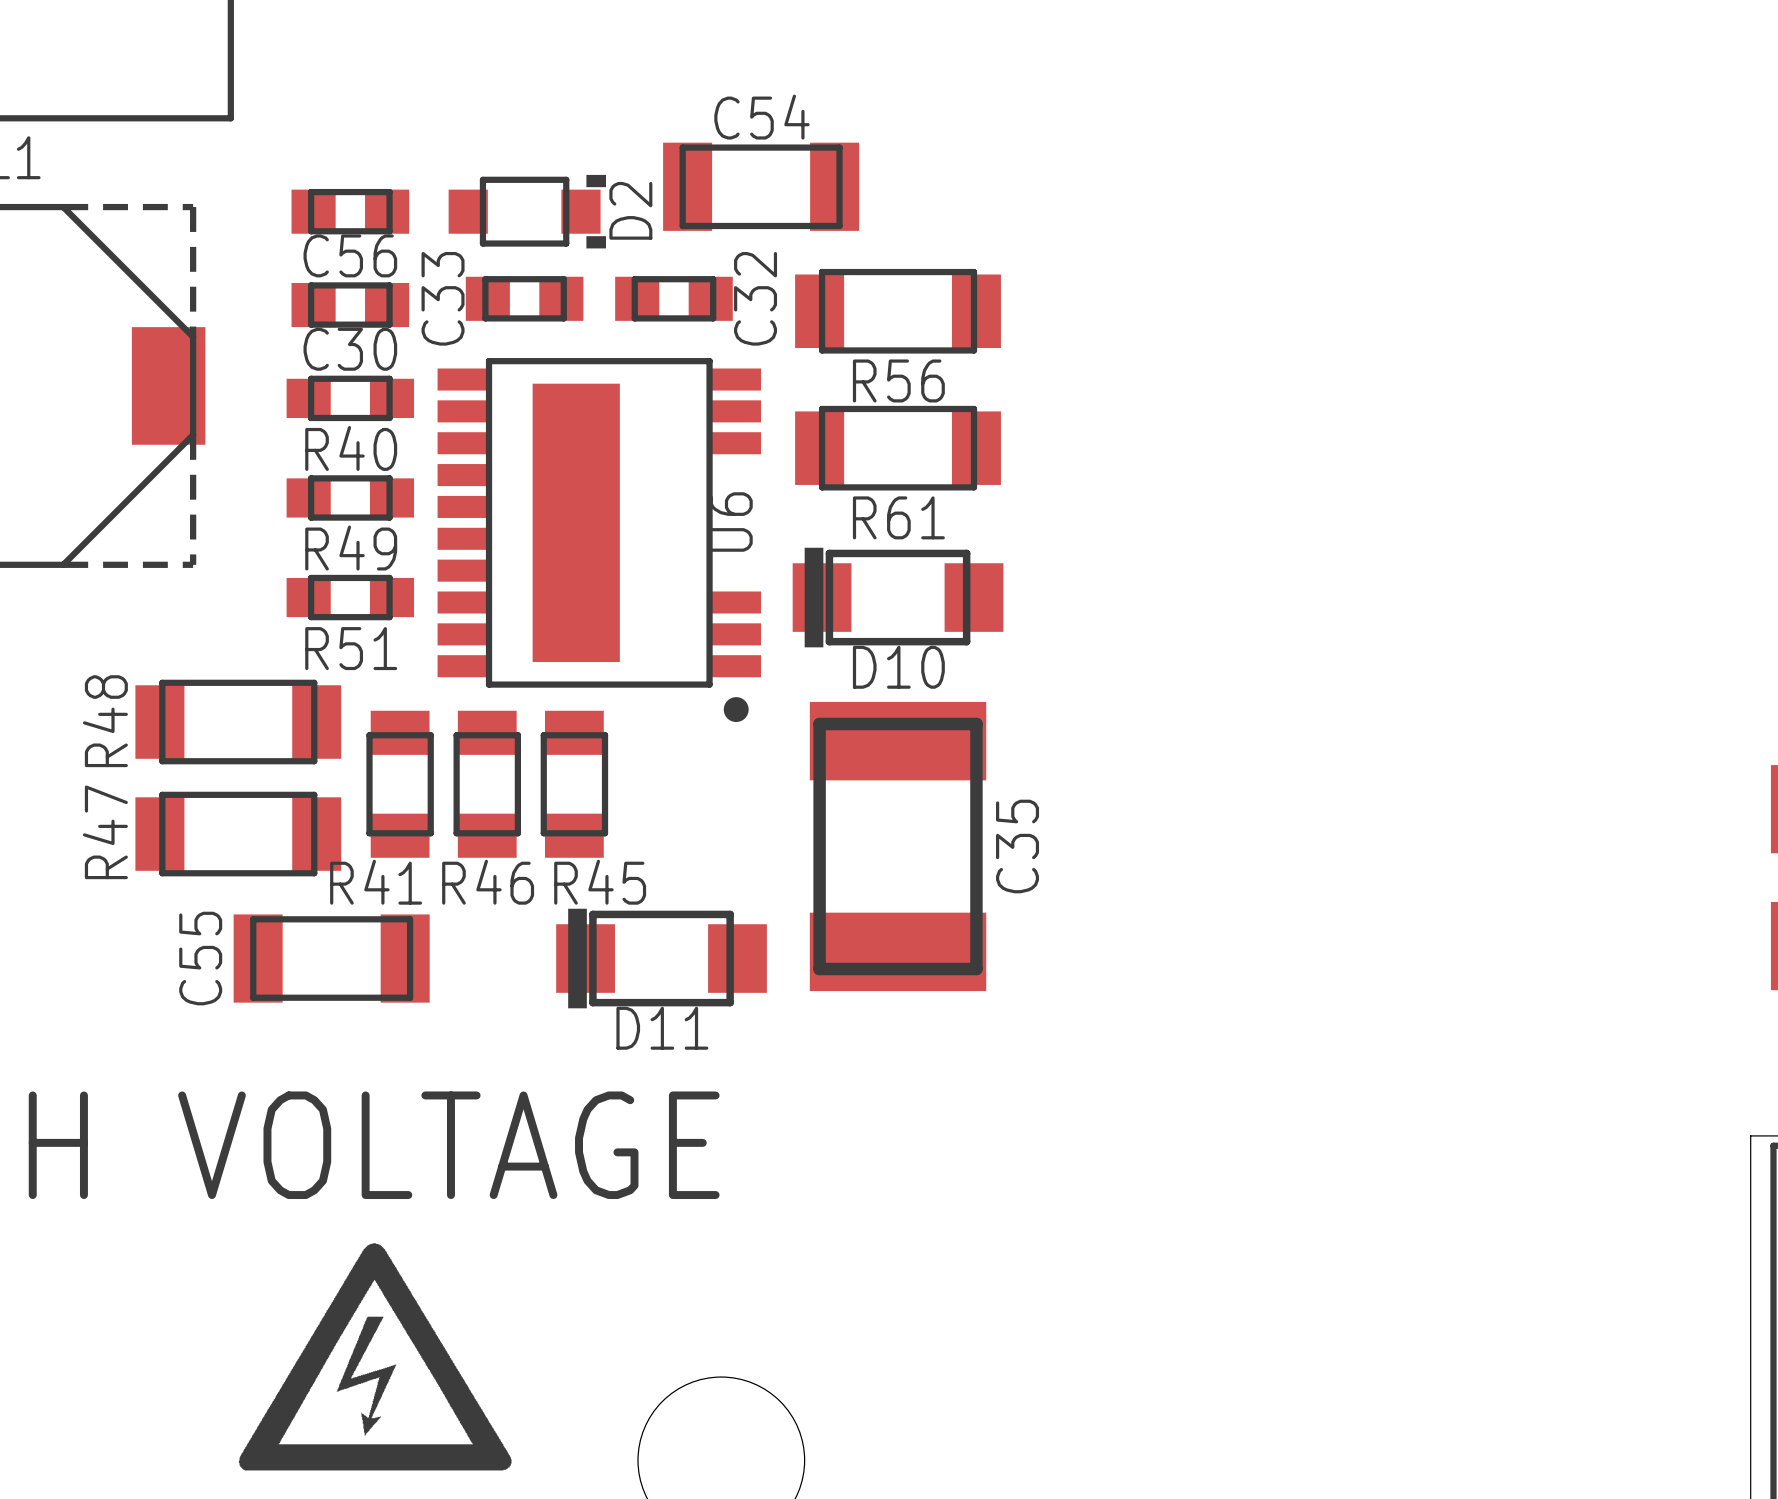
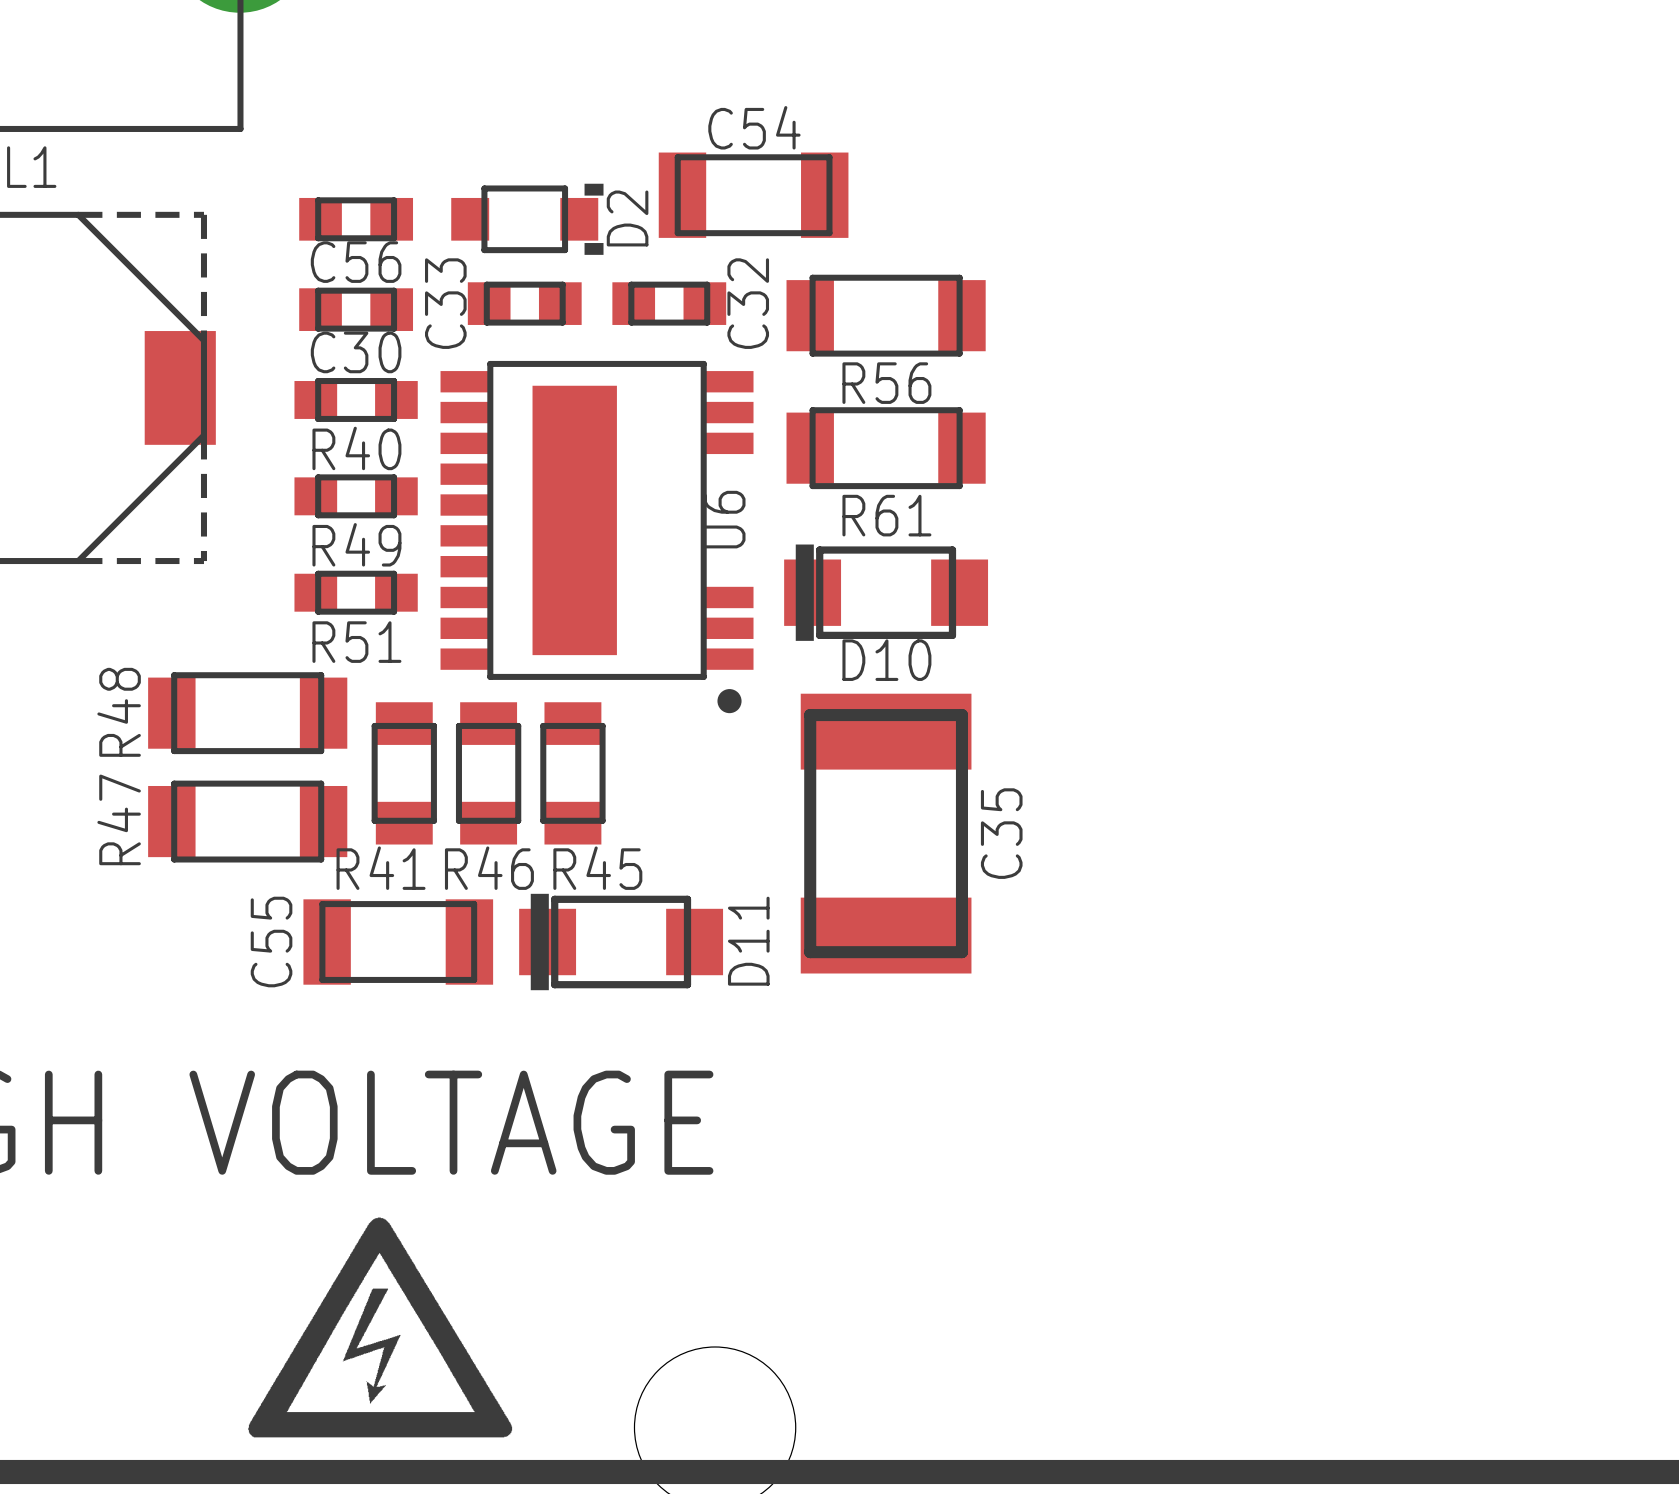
C55 position: (331, 958) -> (398, 942)
D11 position: (661, 958) -> (621, 942)
D11 name rotation: 0° (662, 1028) -> 90° counterclockwise (748, 941)

